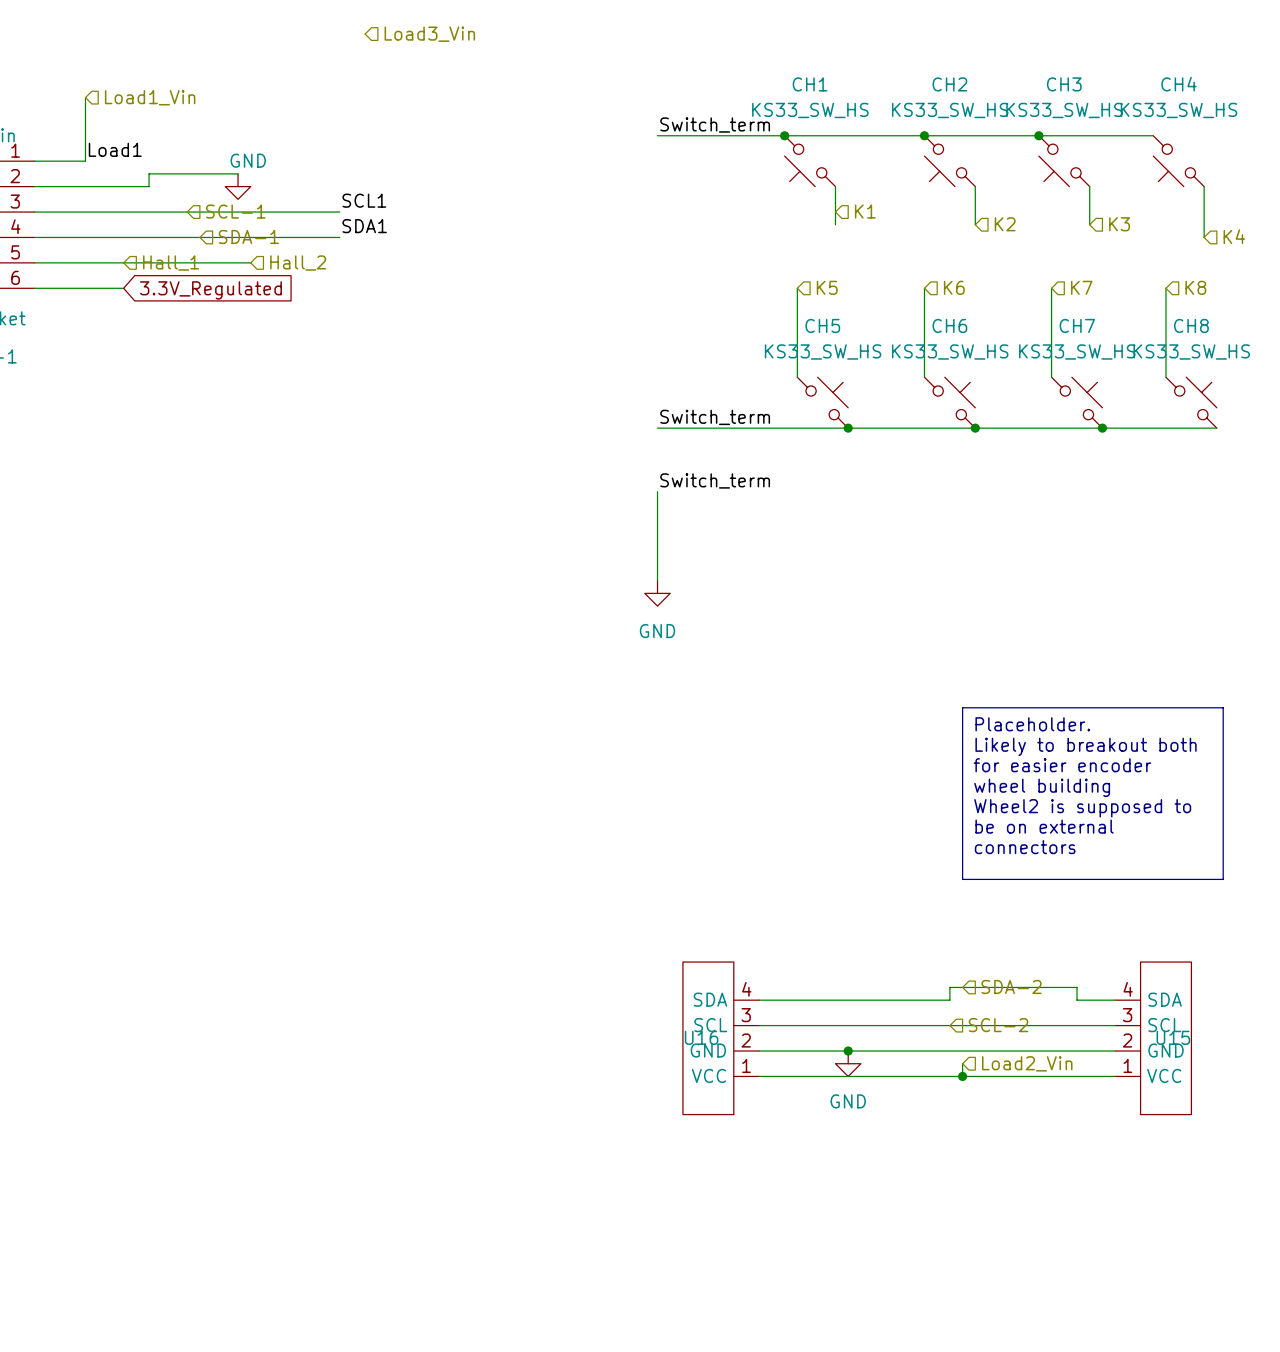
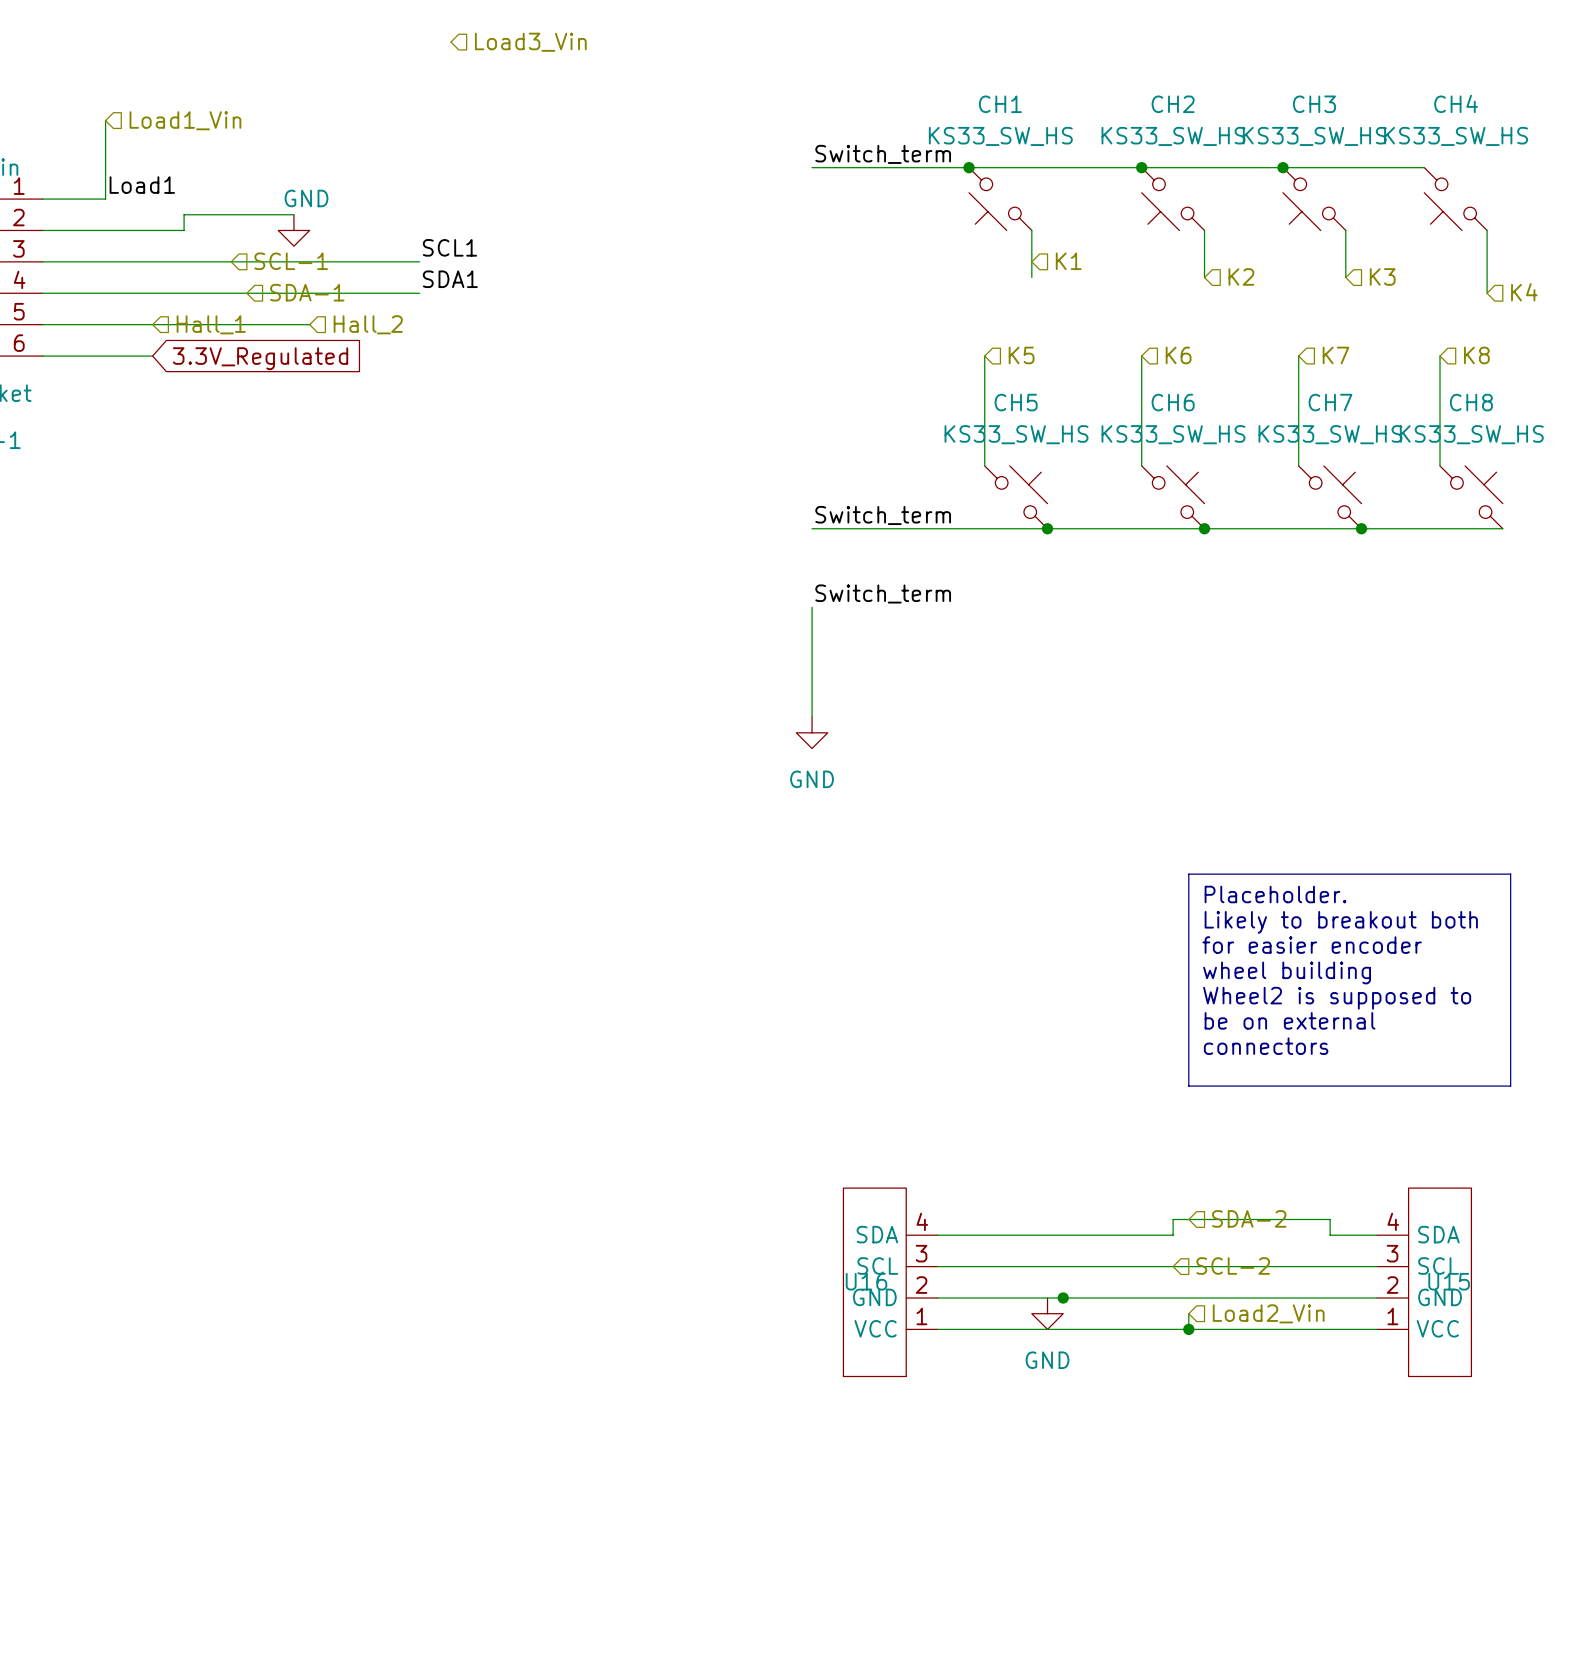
junction position: (848, 1051) -> (1063, 1298)

